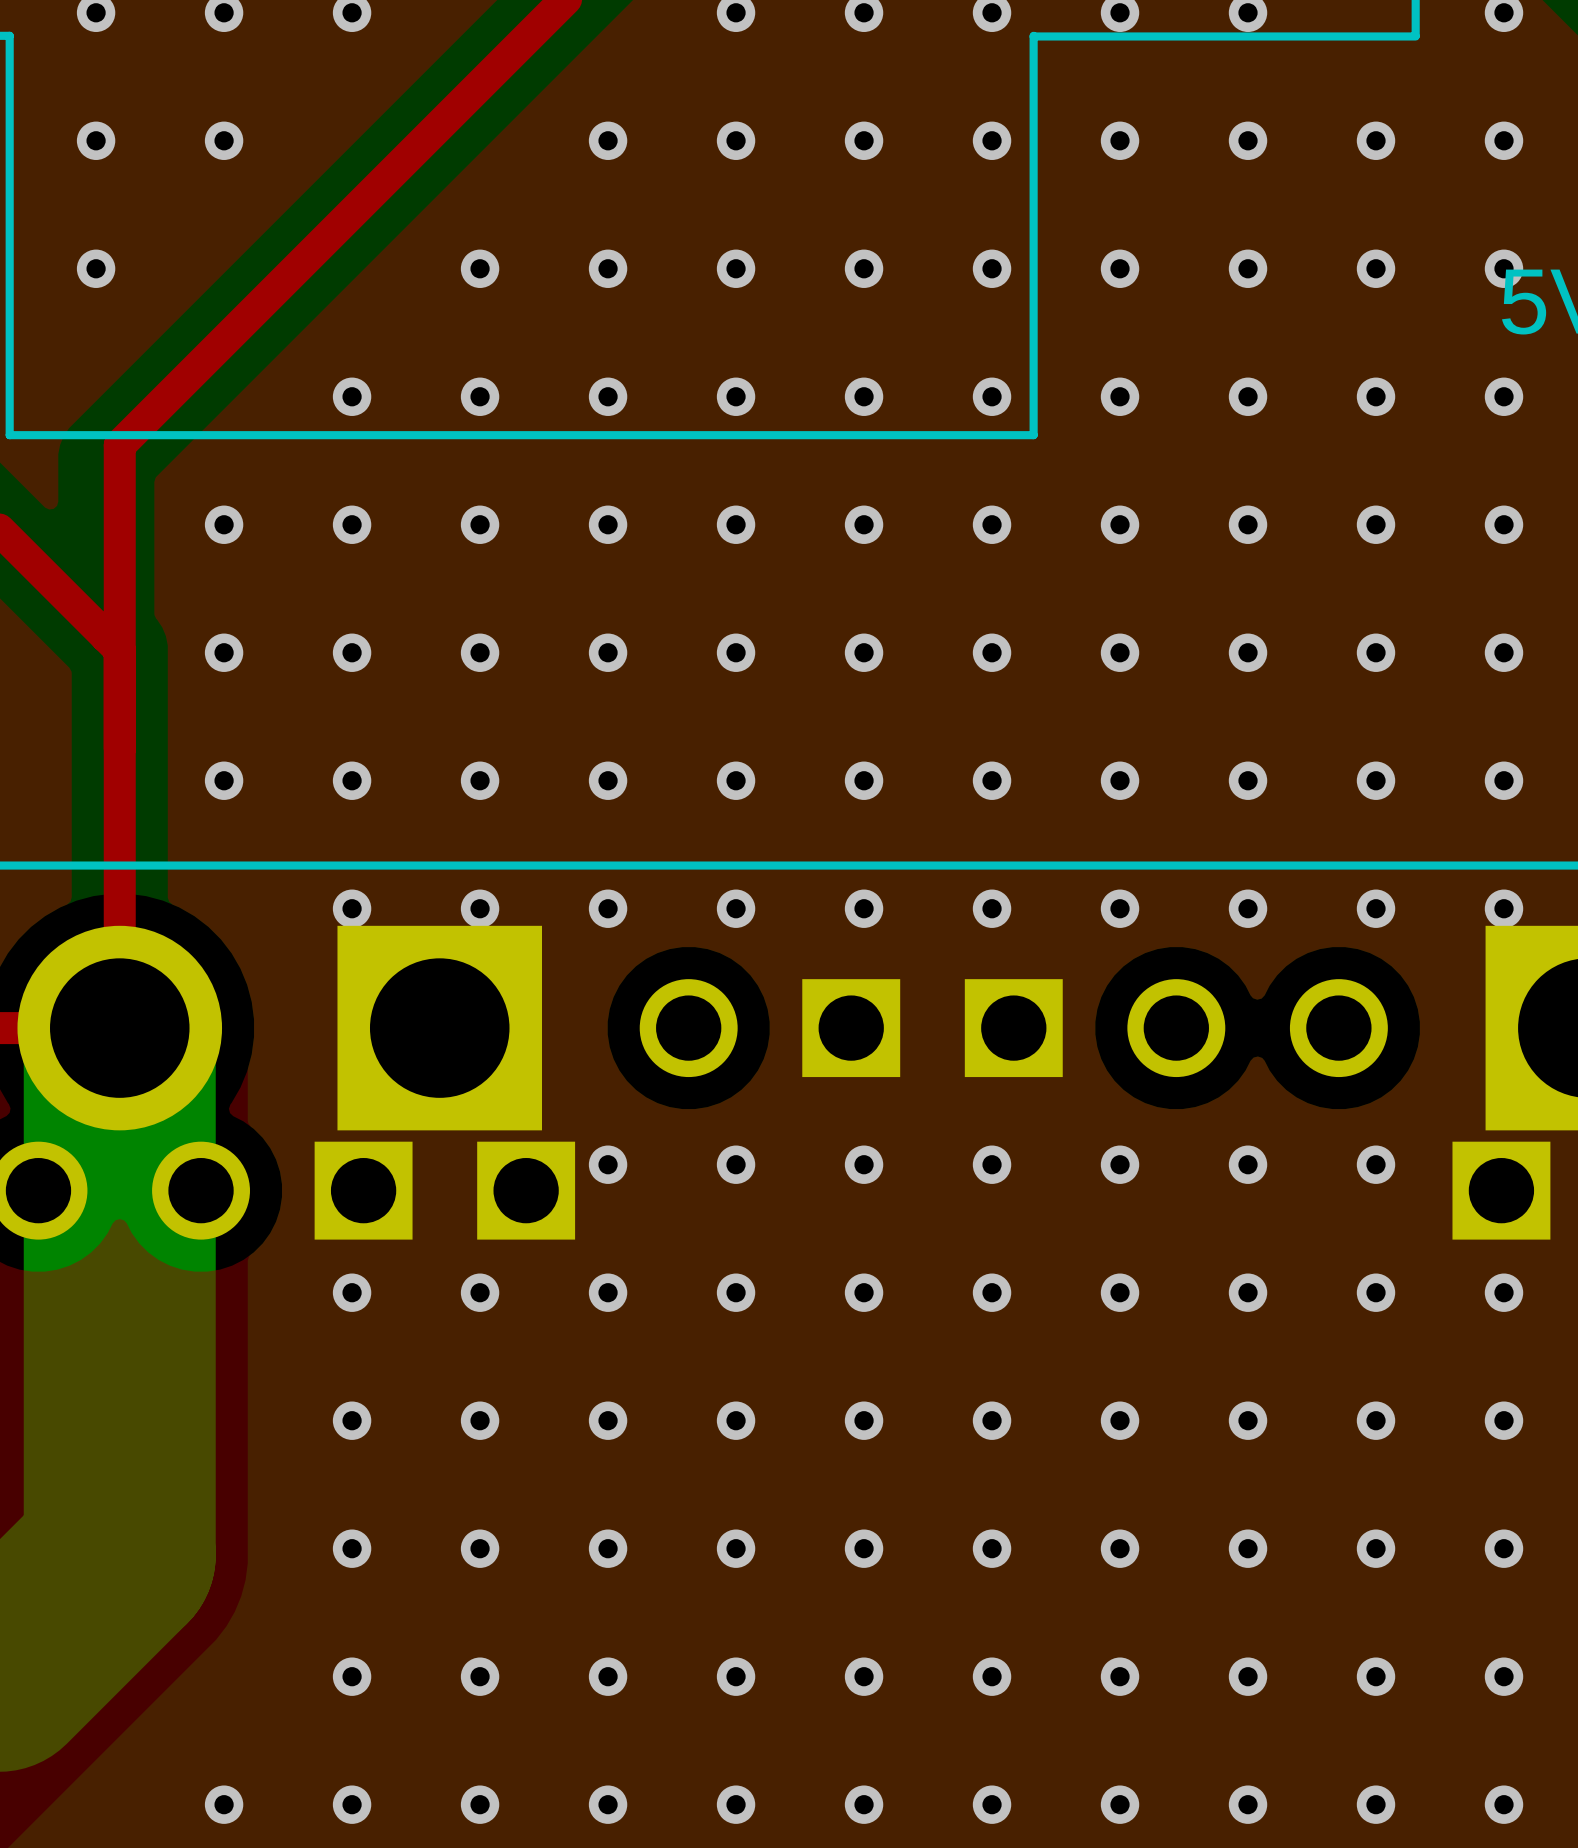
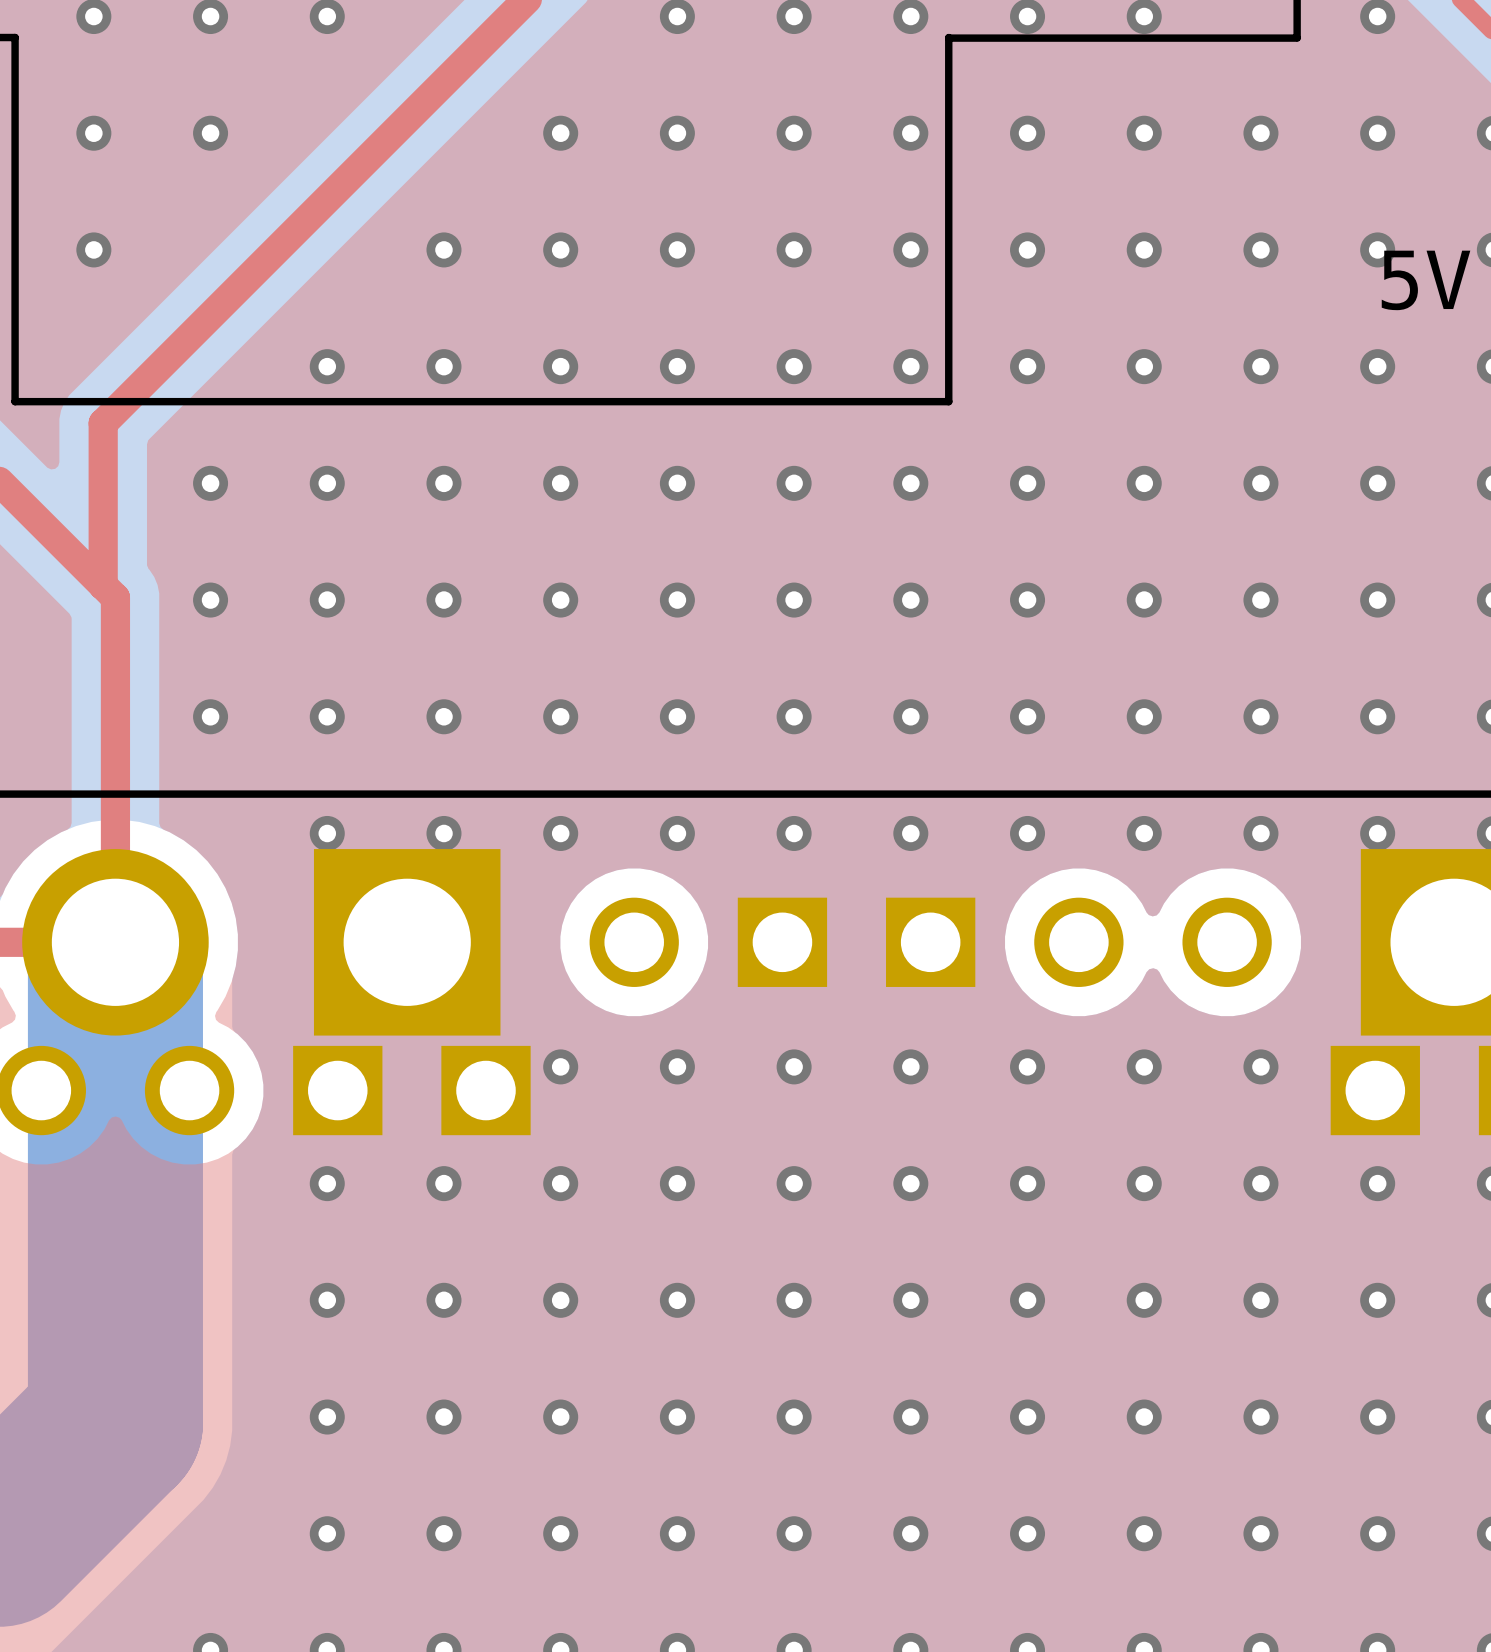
top track: (119, 445) (119, 650) -> (115, 410) (103, 423) (103, 585)

